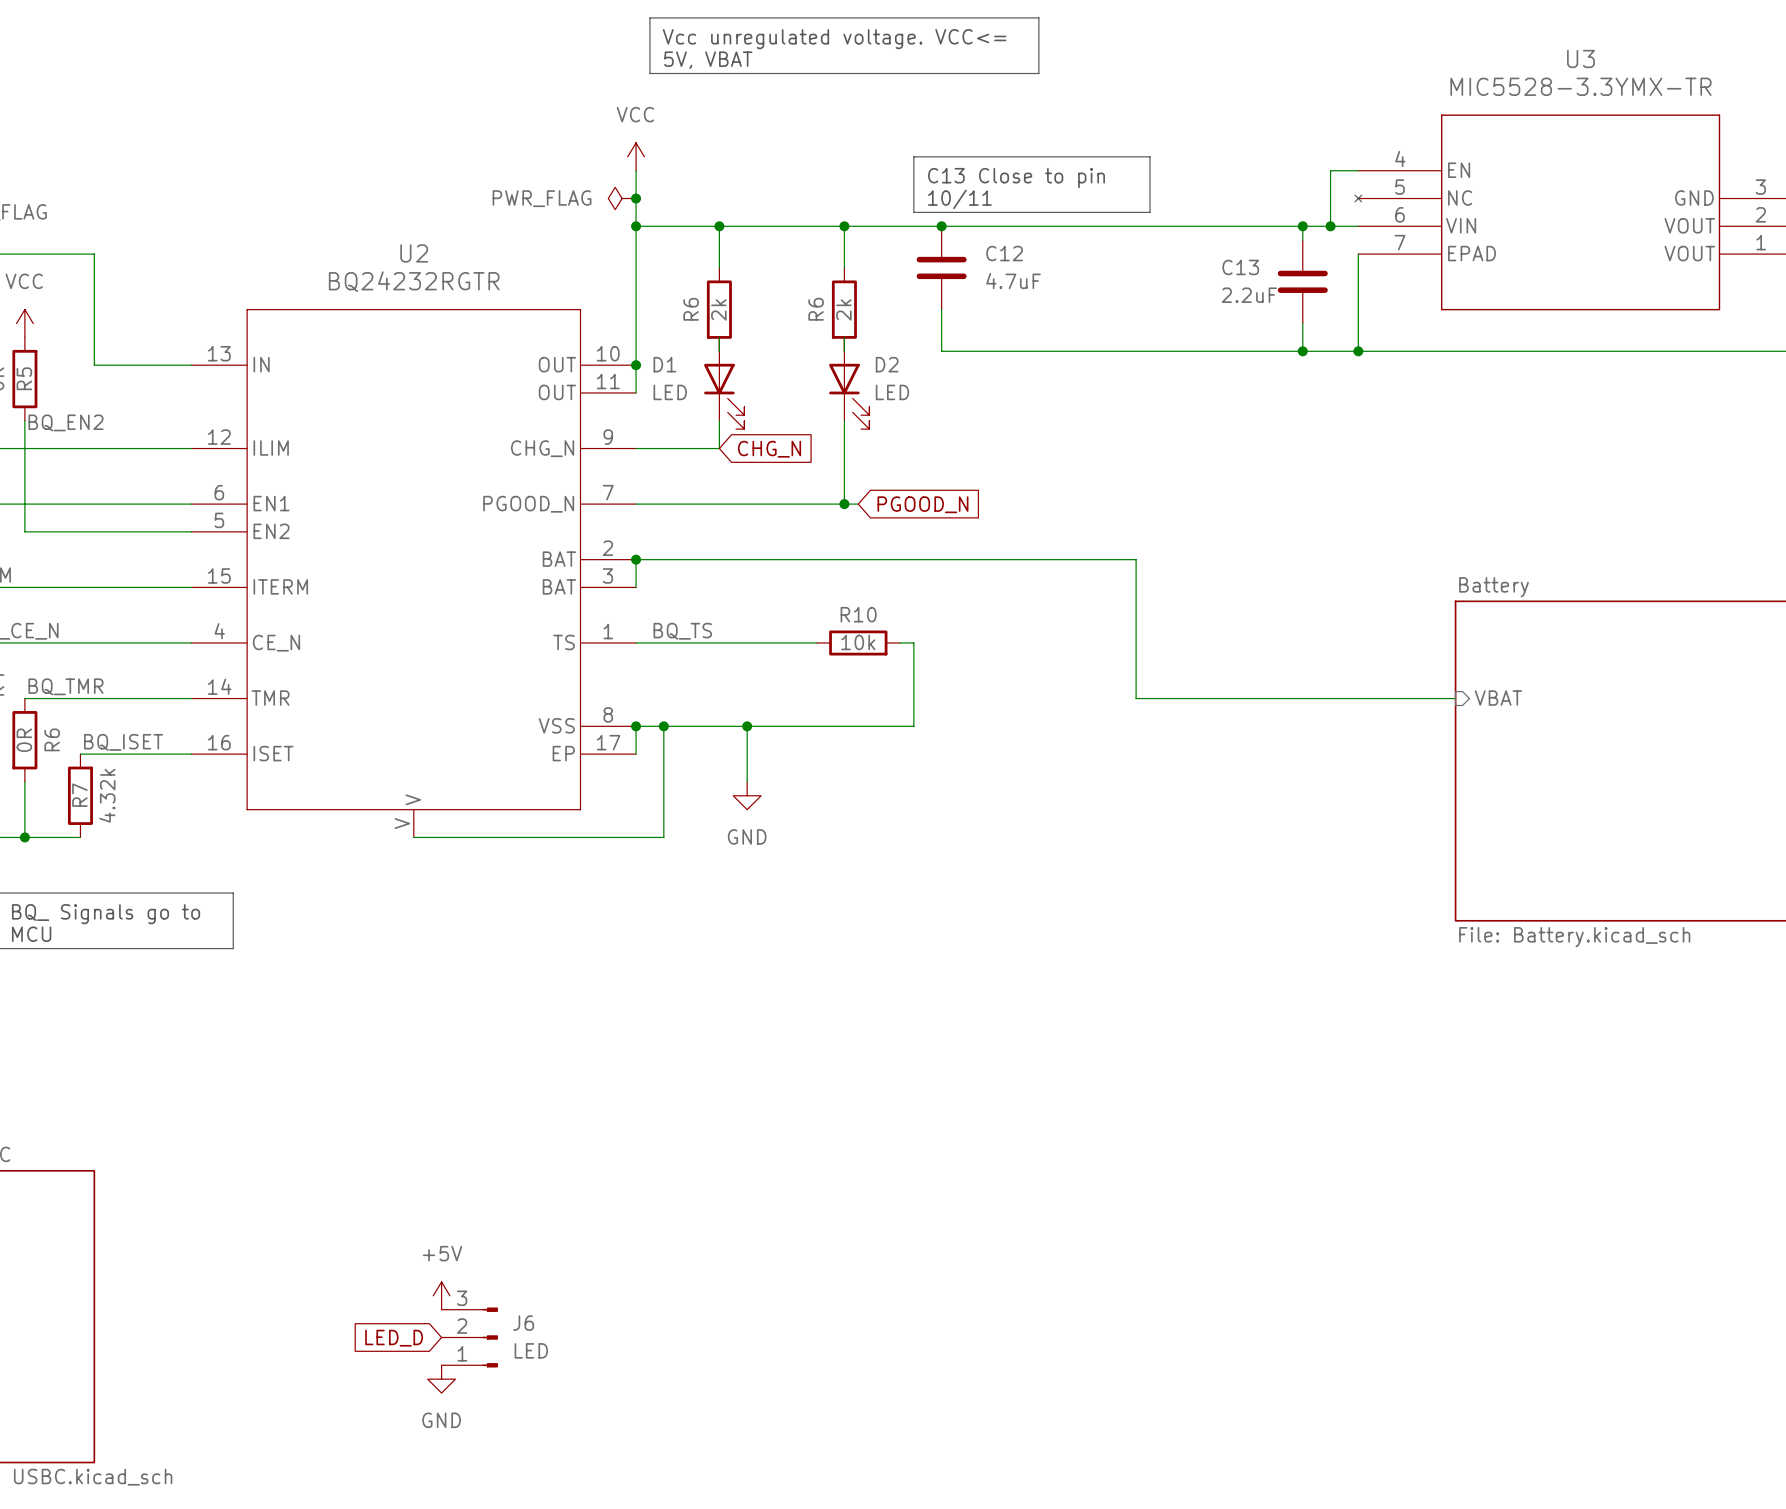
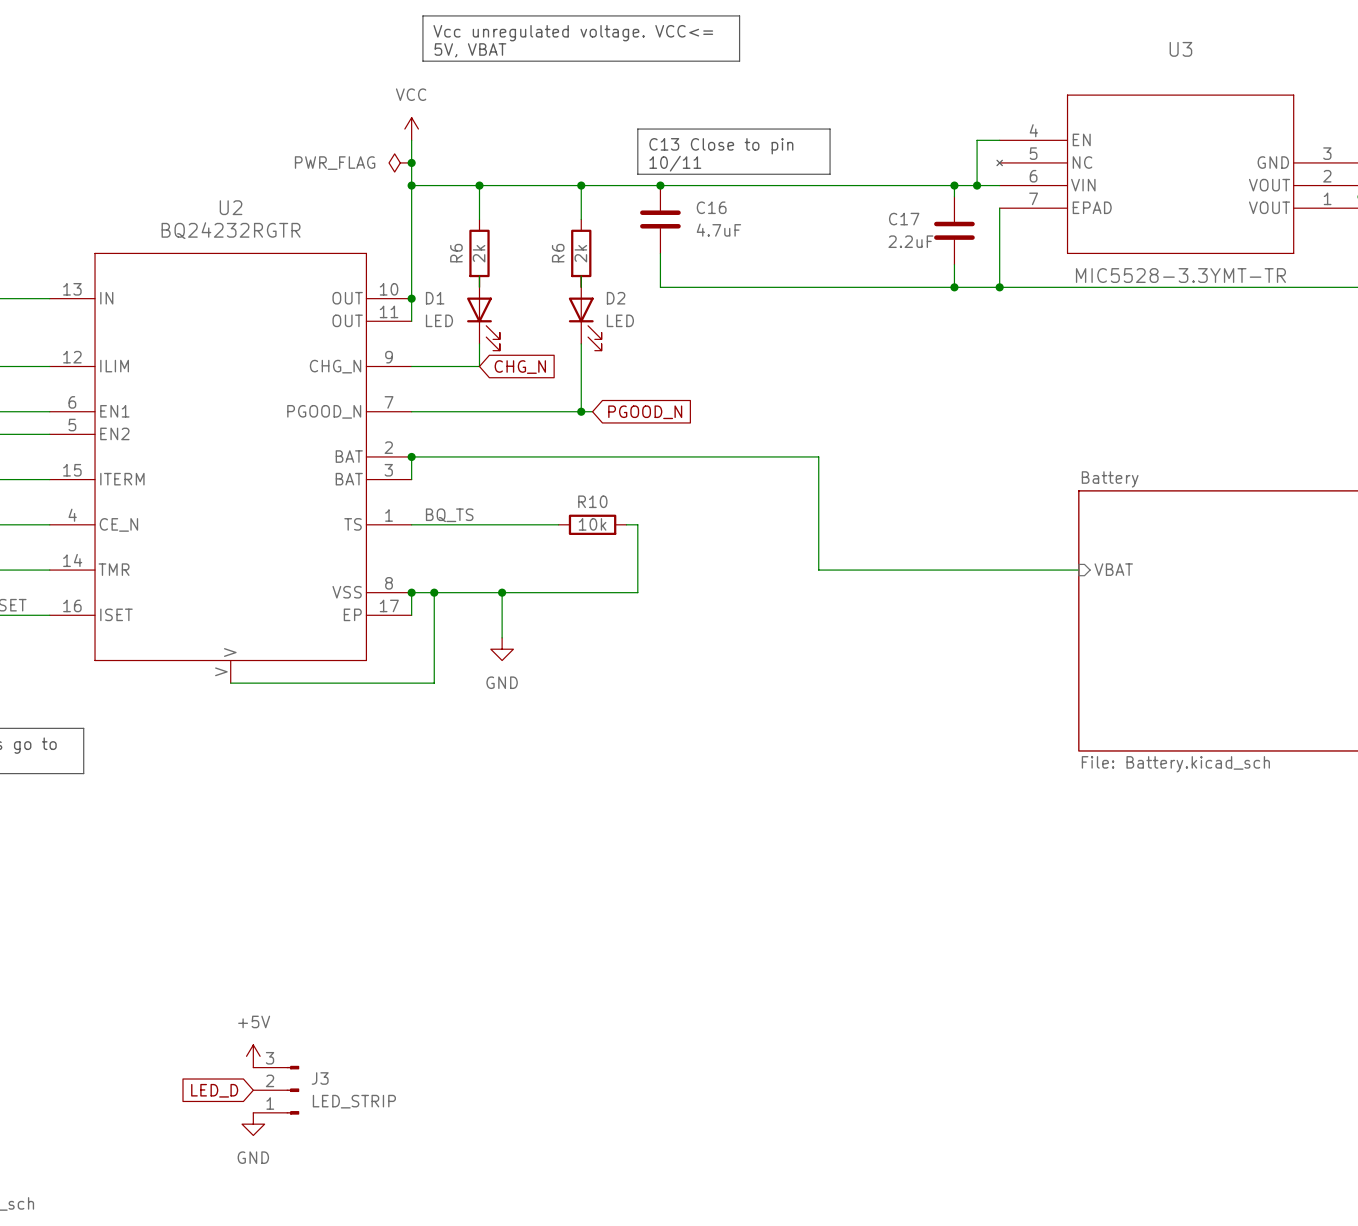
U3 value: MIC5528-3.3YMX-TR (1580, 86) -> MIC5528-3.3YMT-TR (1180, 275)
C12 name: C12 (1004, 253) -> C16 (711, 207)
C13 name: C13 (1240, 267) -> C17 (904, 219)
J6 name: J6 (523, 1323) -> J3 (320, 1078)
J6 value: LED (531, 1350) -> LED_STRIP (354, 1101)

